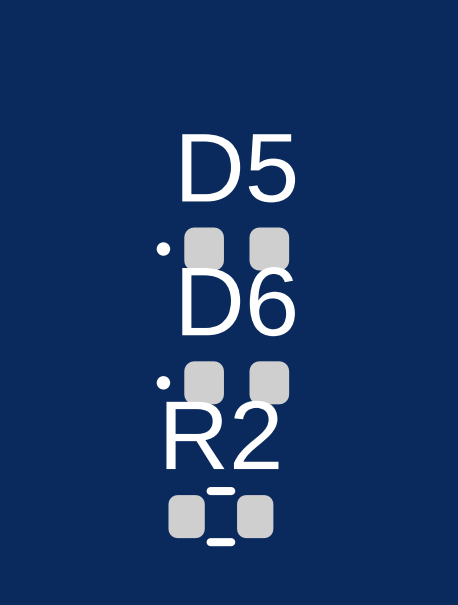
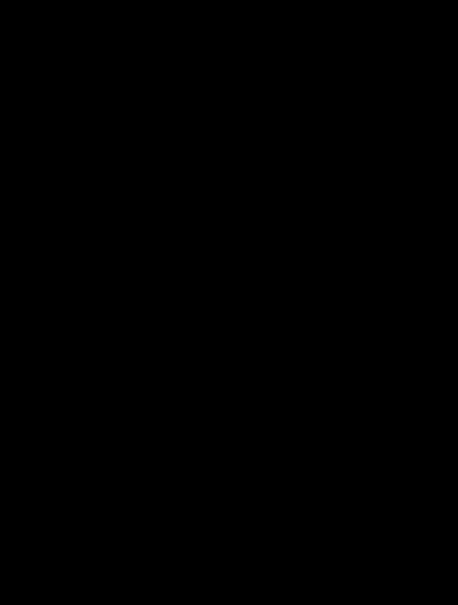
D5: (222, 249) -> none
D6: (222, 382) -> none
R2: (220, 516) -> none

